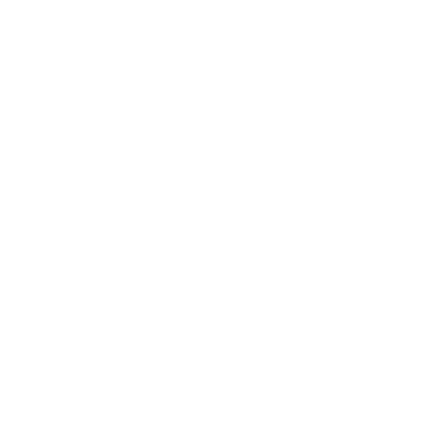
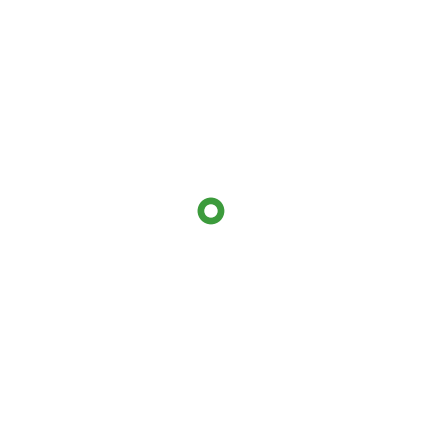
via: none -> (210, 210)

